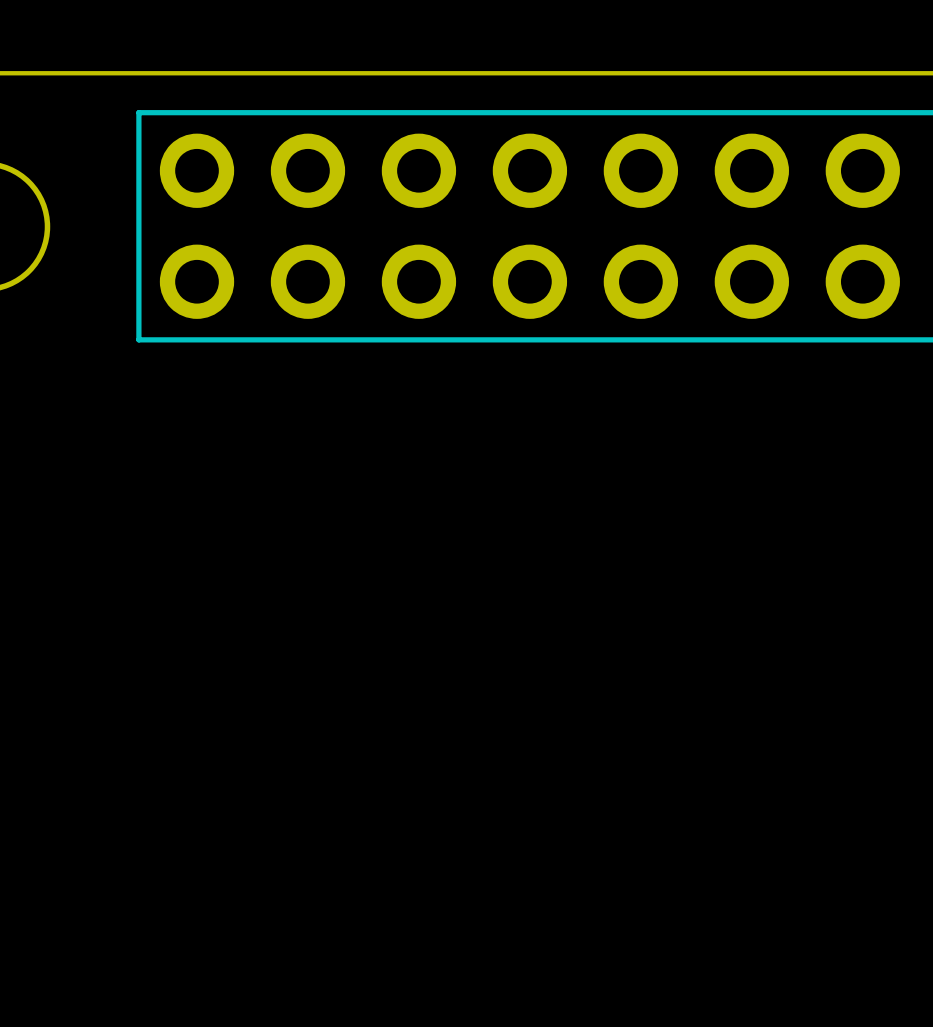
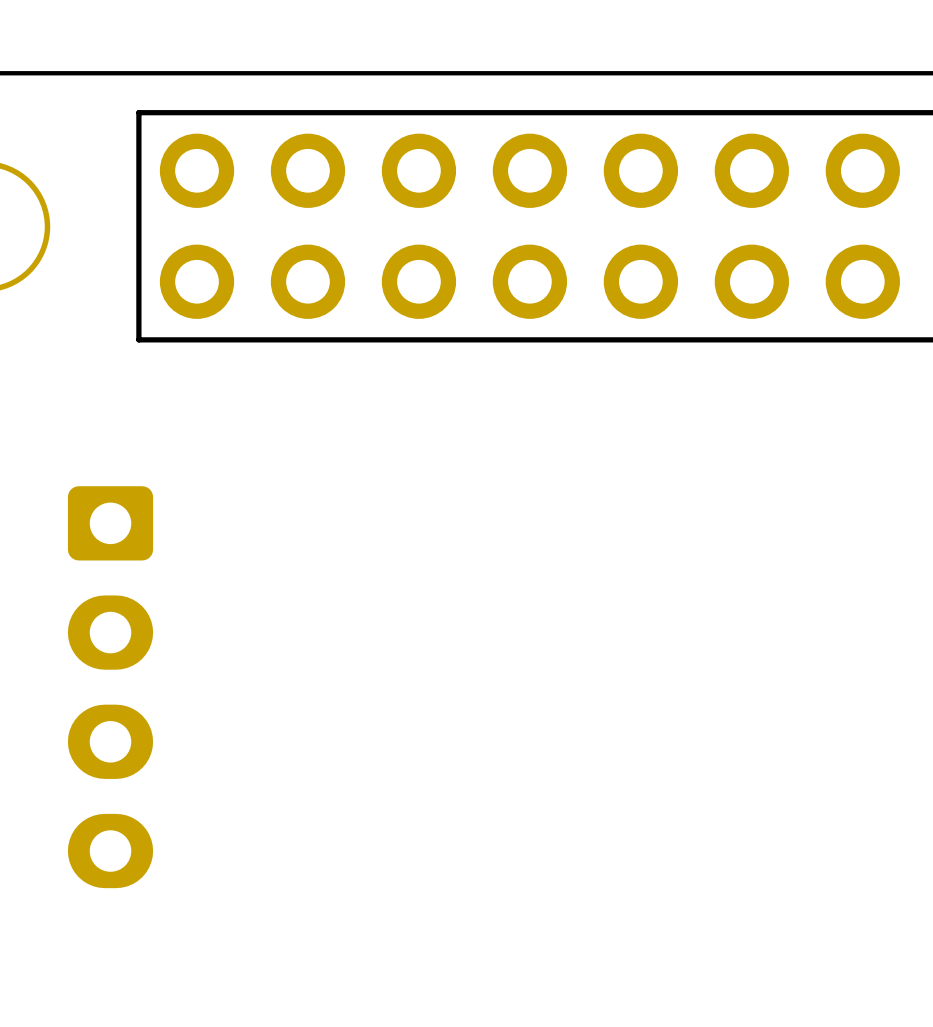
part: none -> (110, 687)

